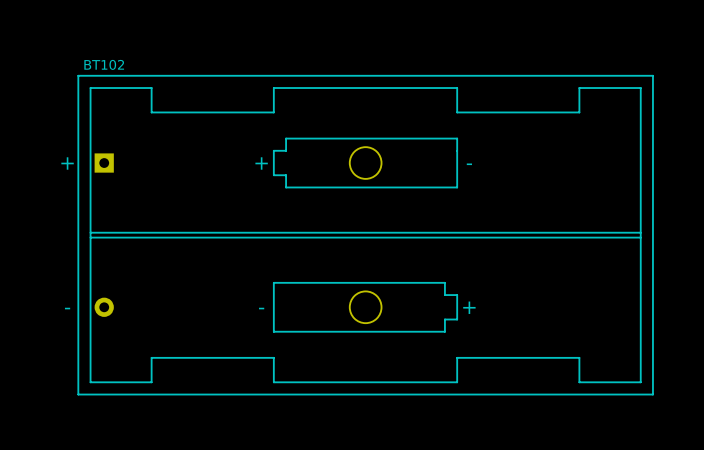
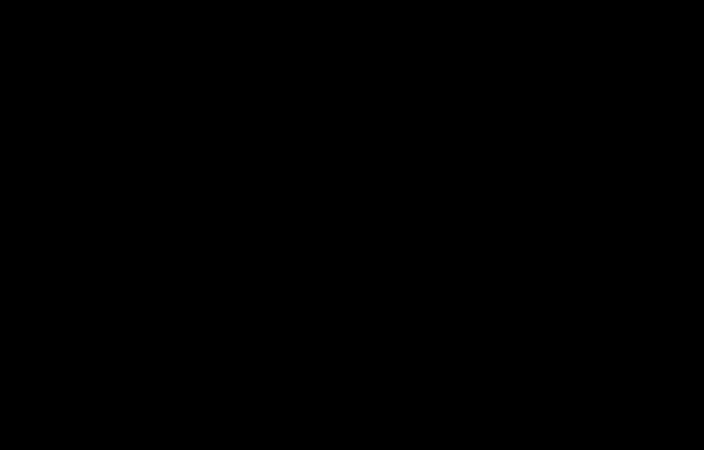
BT102: (365, 235) -> none

